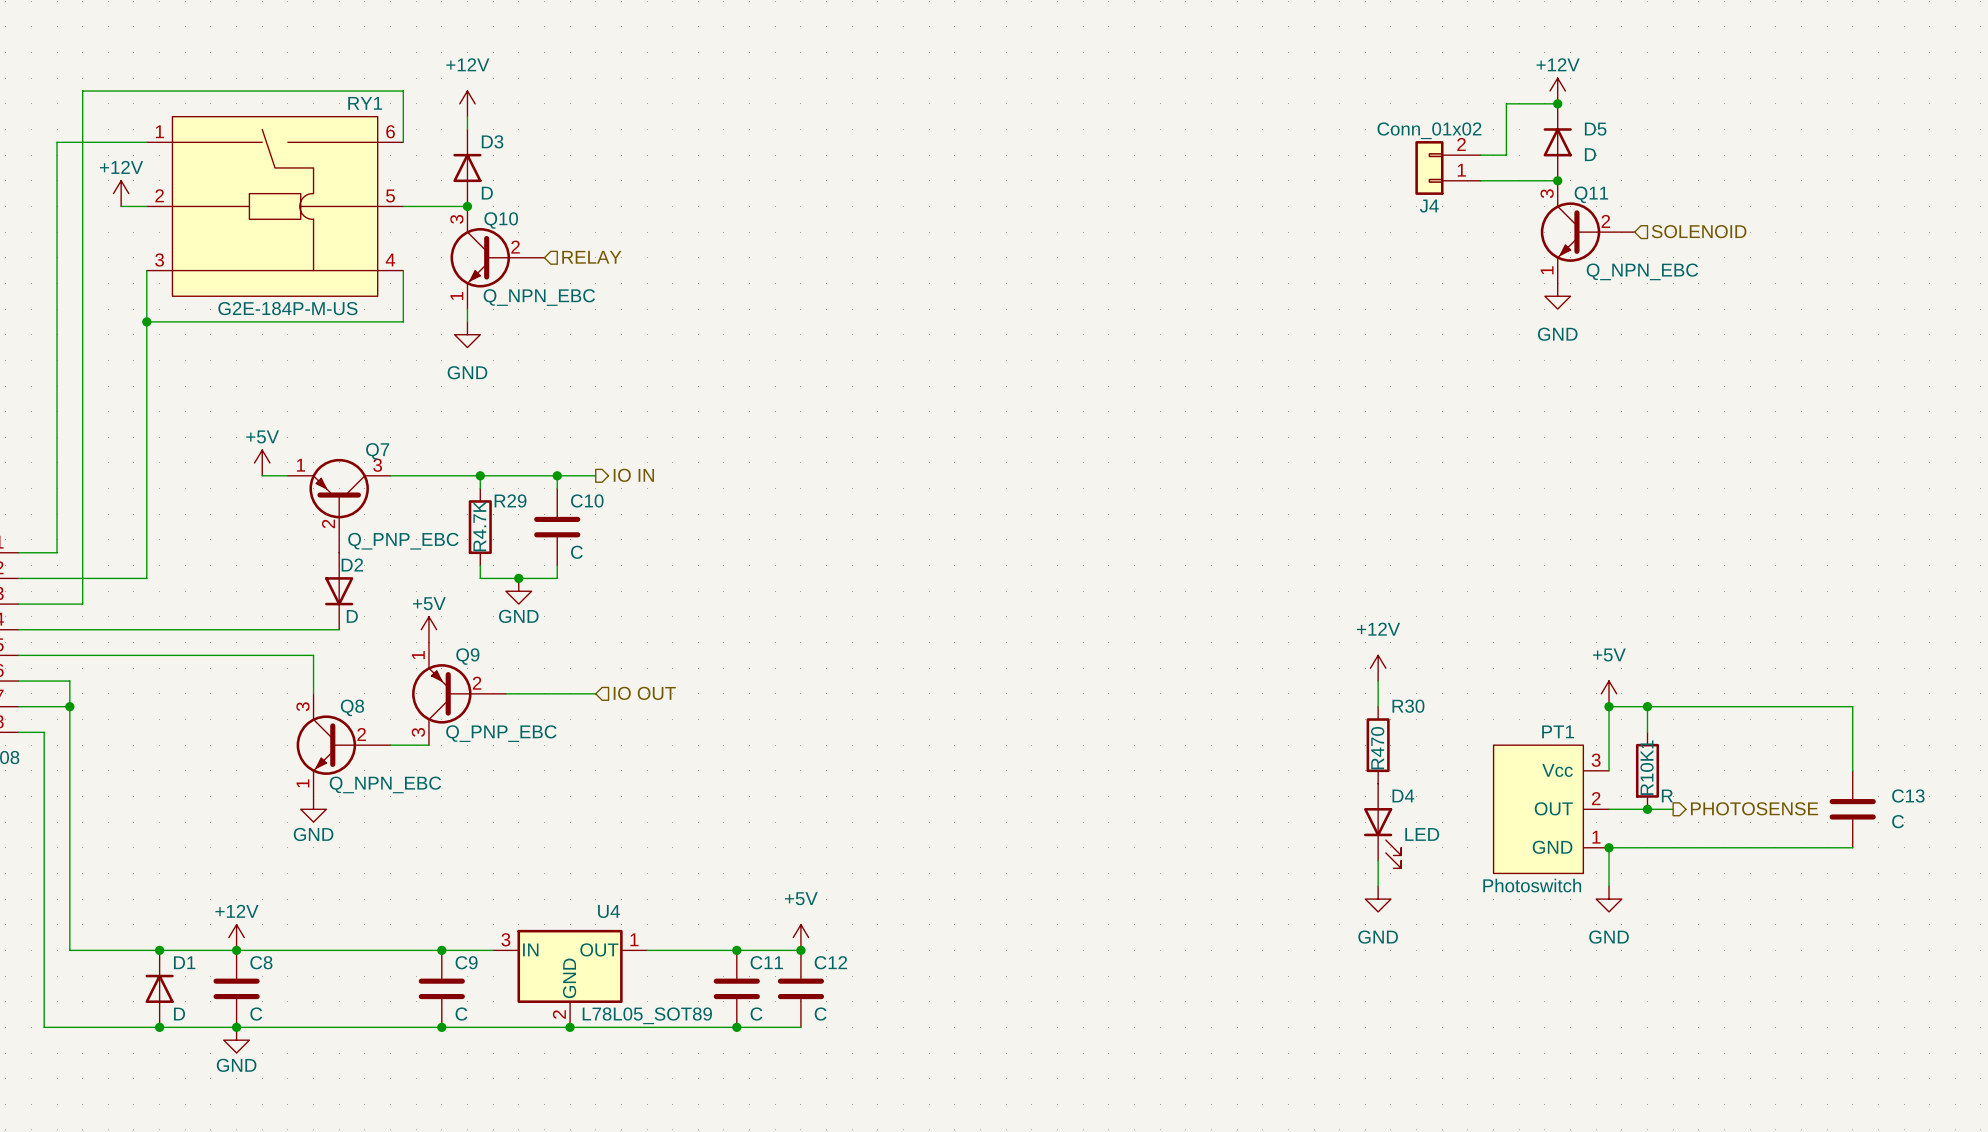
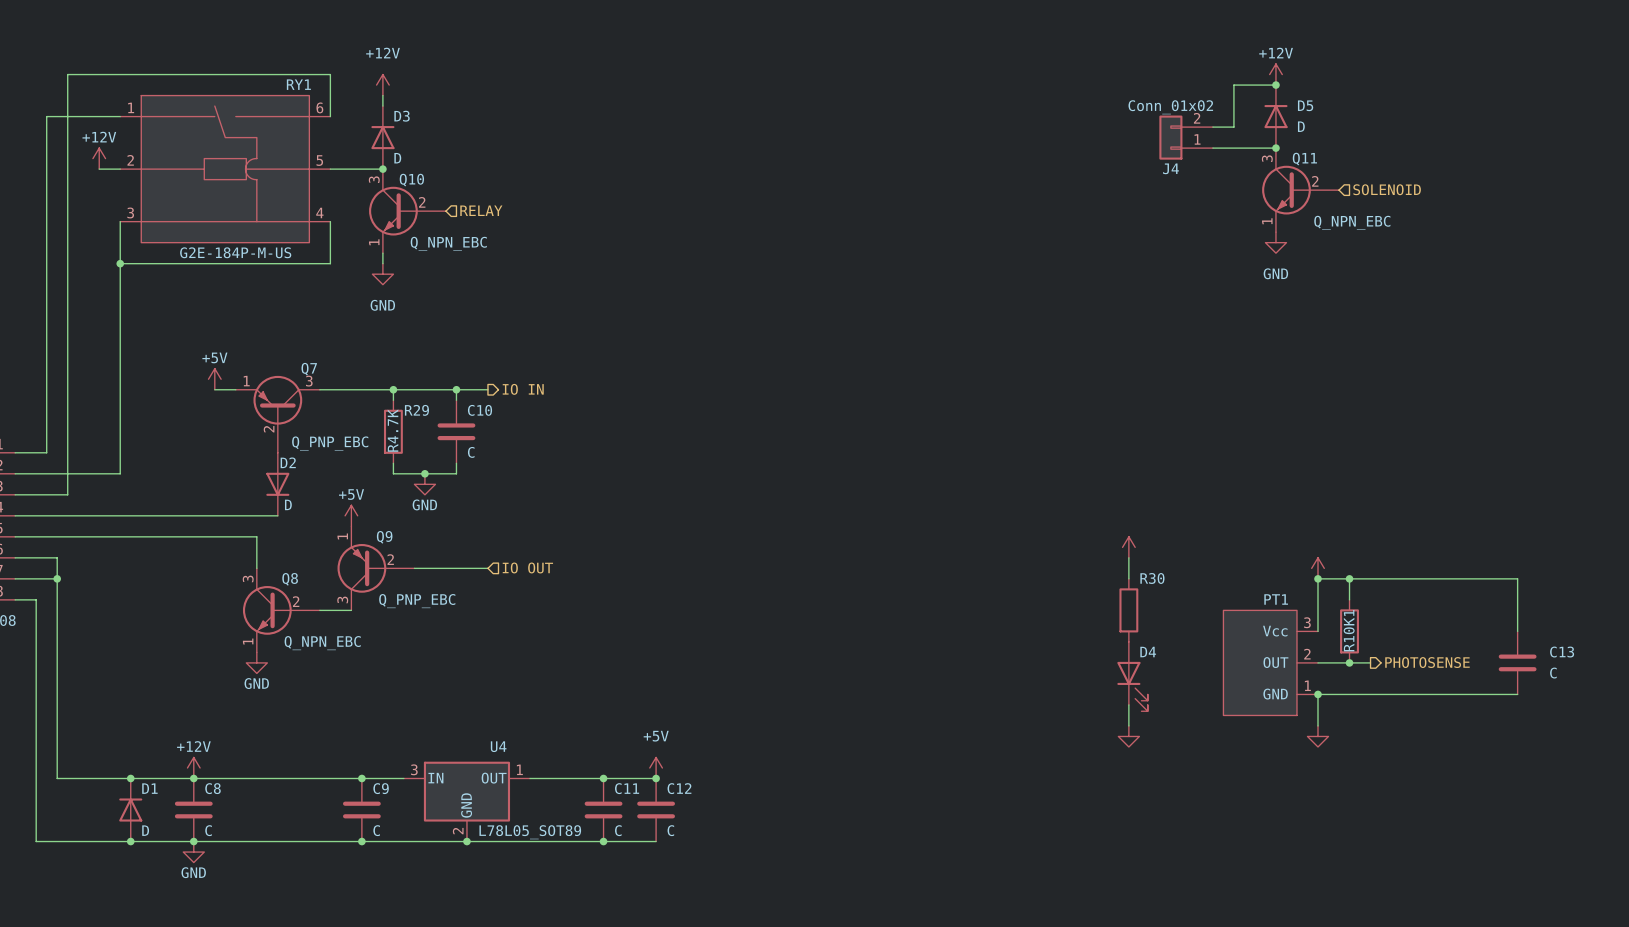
power symbol text: +12V (1378, 629) -> none
power symbol text: +5V (1609, 654) -> none
R30 value: R470 (1377, 748) -> none
R10K1 value: R (1667, 795) -> none
D4 value: LED (1422, 834) -> none
PT1 value: Photoswitch (1532, 885) -> none
power symbol text: GND (1378, 937) -> none
power symbol text: GND (1609, 937) -> none

